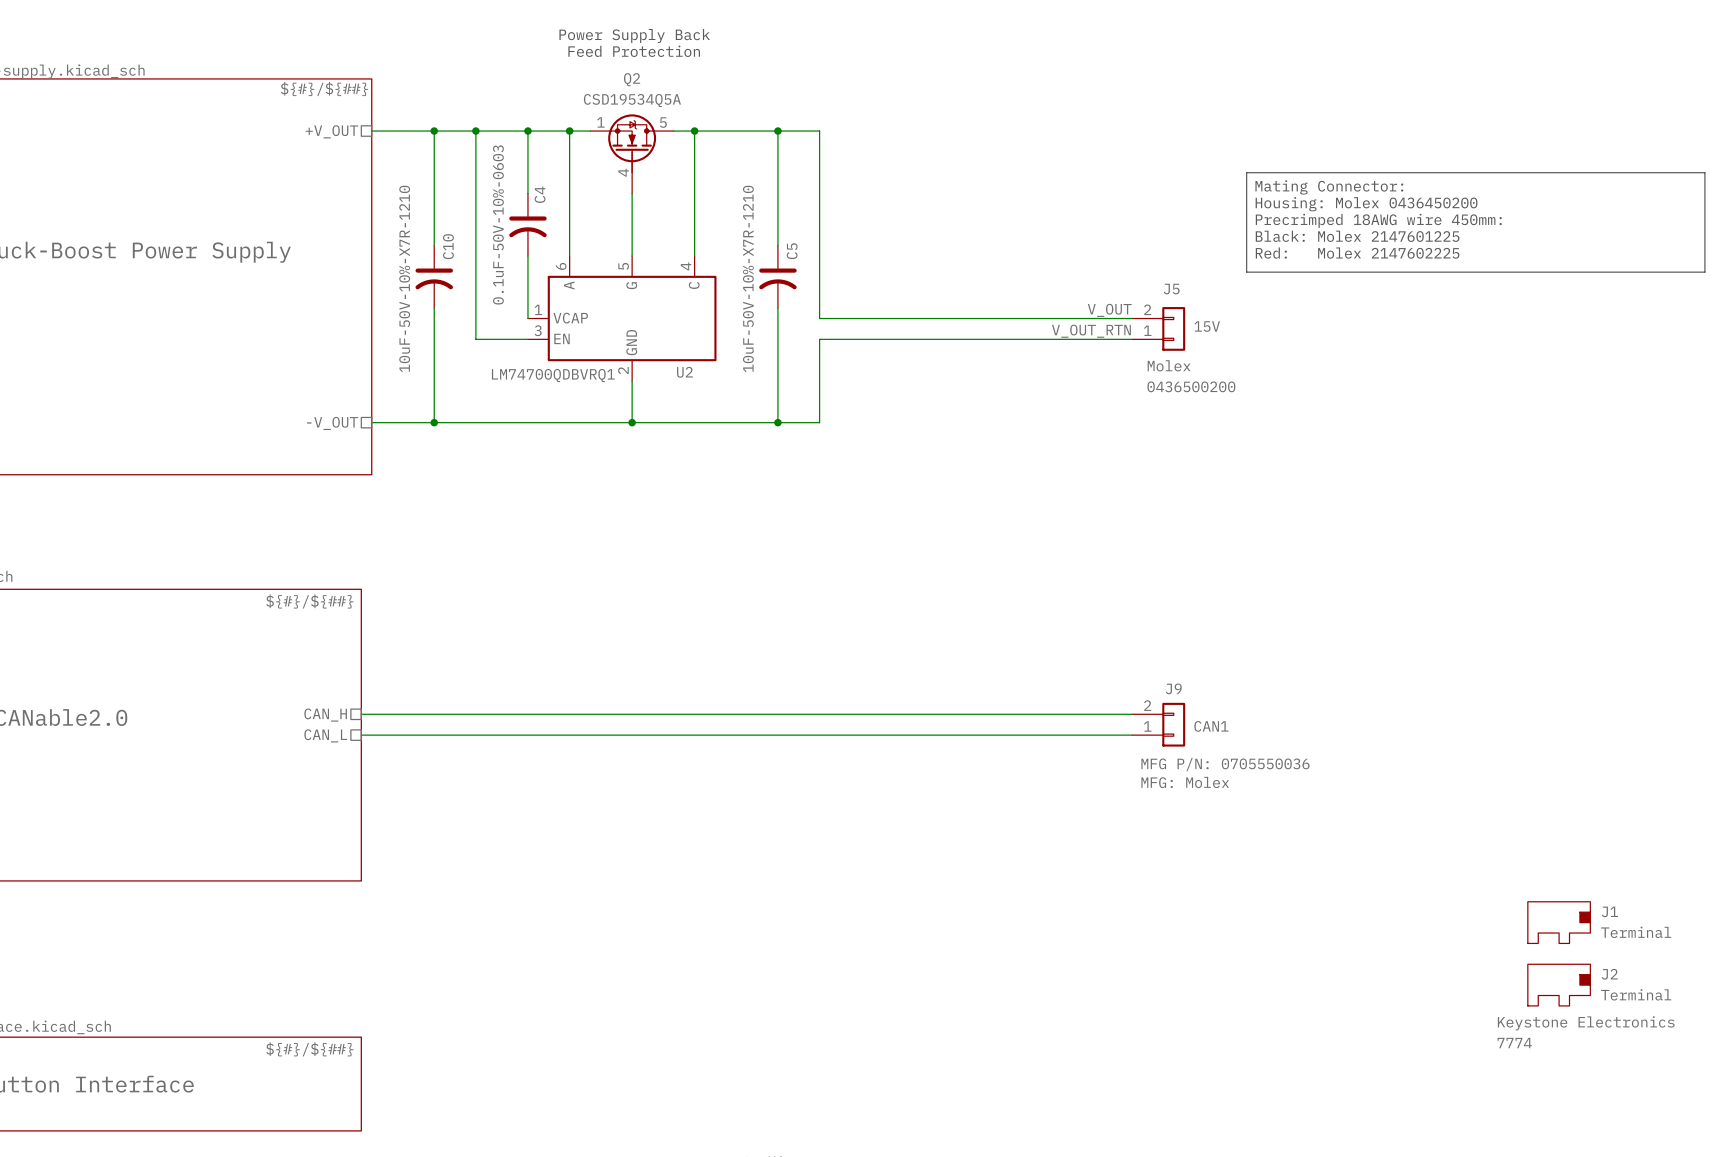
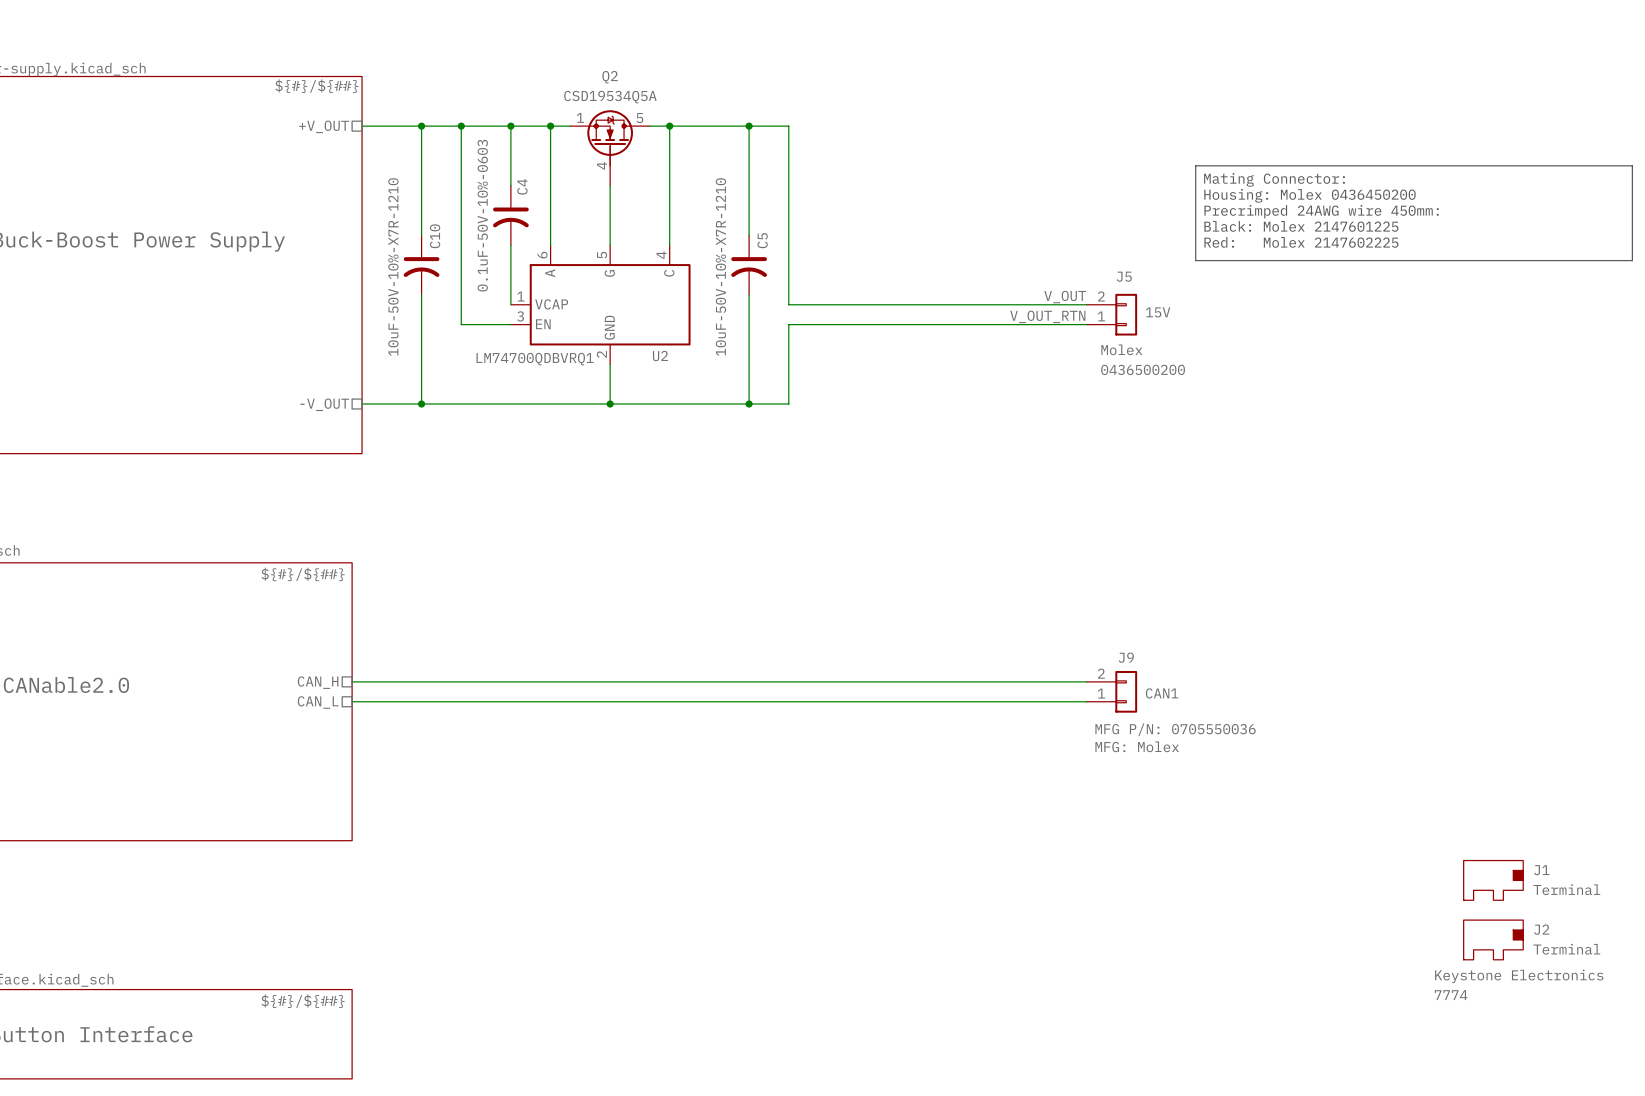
text: Power Supply Back (634, 35) -> none
text: Feed Protection (634, 51) -> none
text: Precrimped 18AWG wire 450mm: (1378, 220) -> Precrimped 24AWG wire 450mm: (1321, 211)

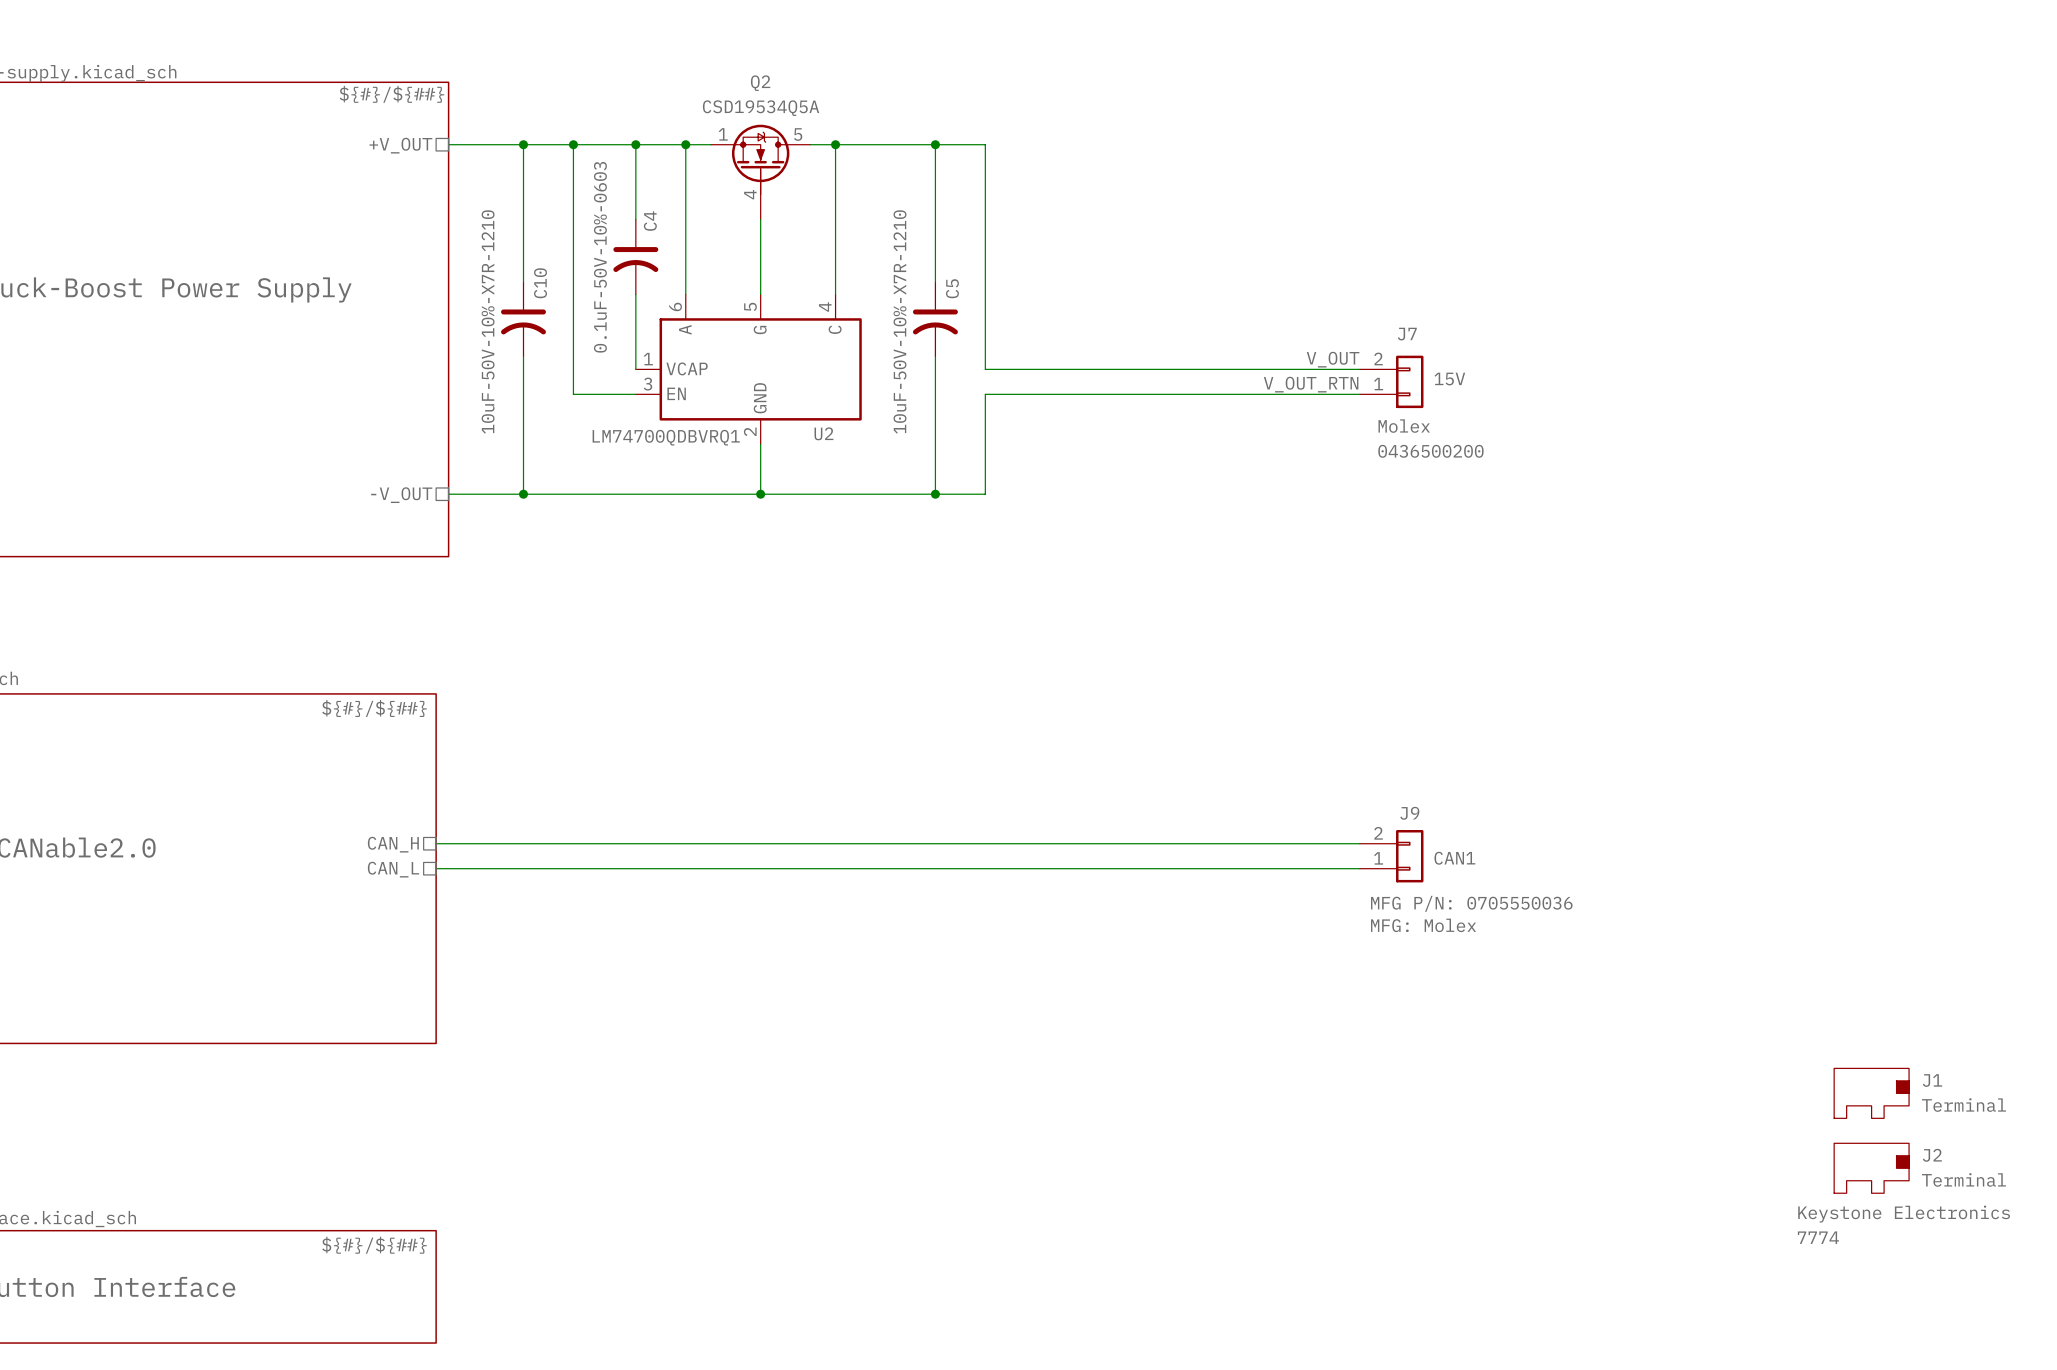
line: (1195, 165) (1632, 165) (1632, 260) (1195, 260) (1195, 165) -> none
text: Mating Connector: (1274, 179) -> none
text: Housing: Molex 0436450200 (1309, 195) -> none
text: Precrimped 24AWG wire 450mm: (1321, 211) -> none
text: Black: Molex 2147601225 (1301, 226) -> none
text: Red: Molex 2147602225 (1301, 242) -> none
J5 name: J5 (1124, 276) -> J7 (1407, 334)

